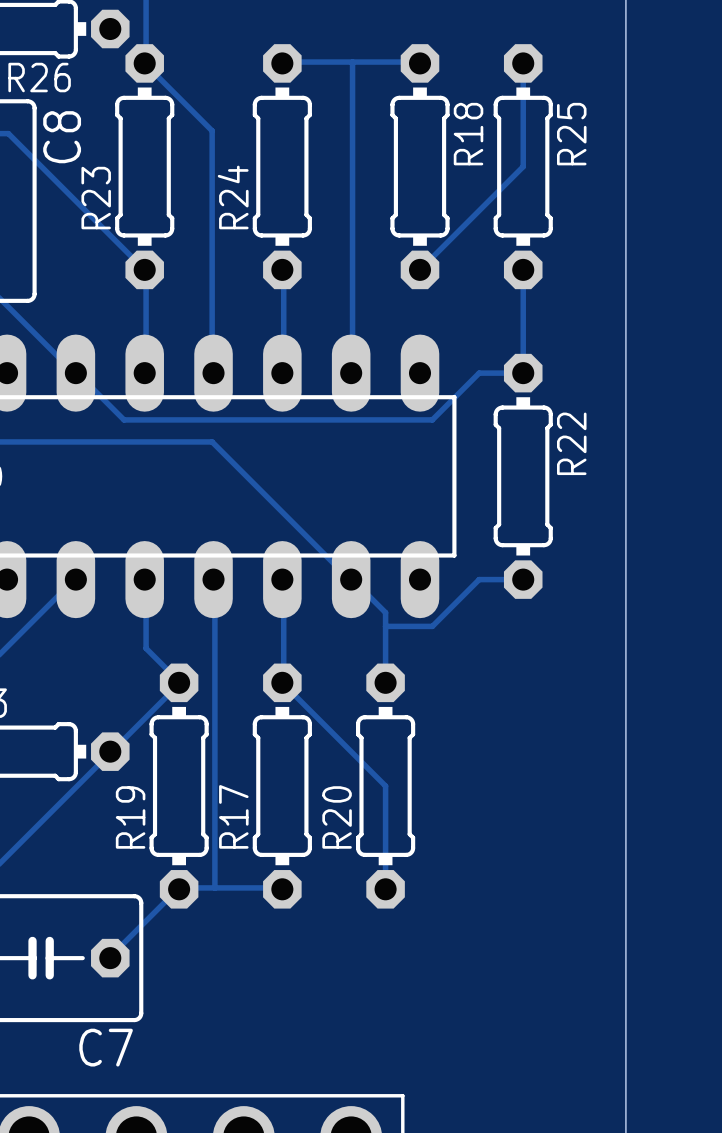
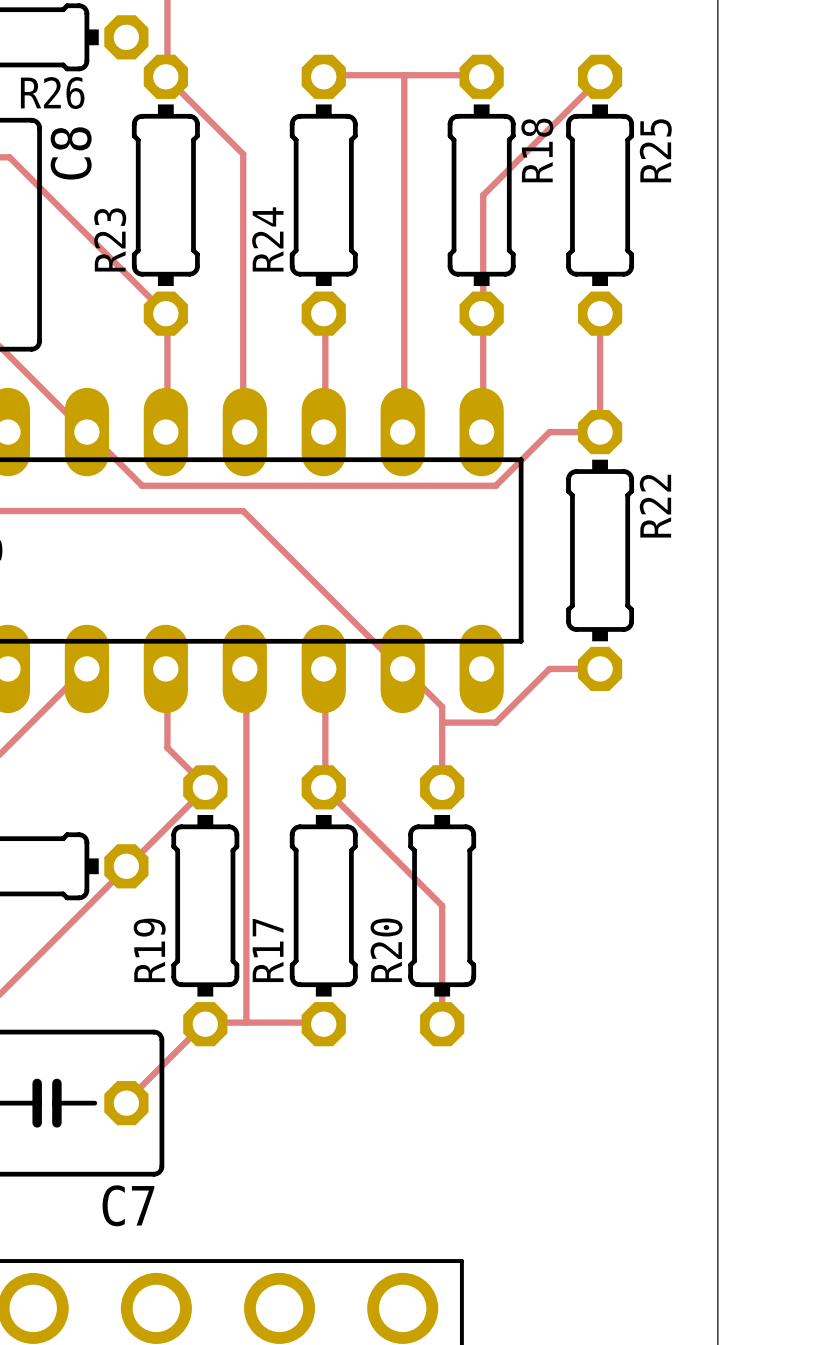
track: (523, 64) (523, 166) (421, 268) -> (600, 78) (483, 195) (483, 312)
track: none -> (481, 313) (483, 315) (483, 432) (481, 432)

